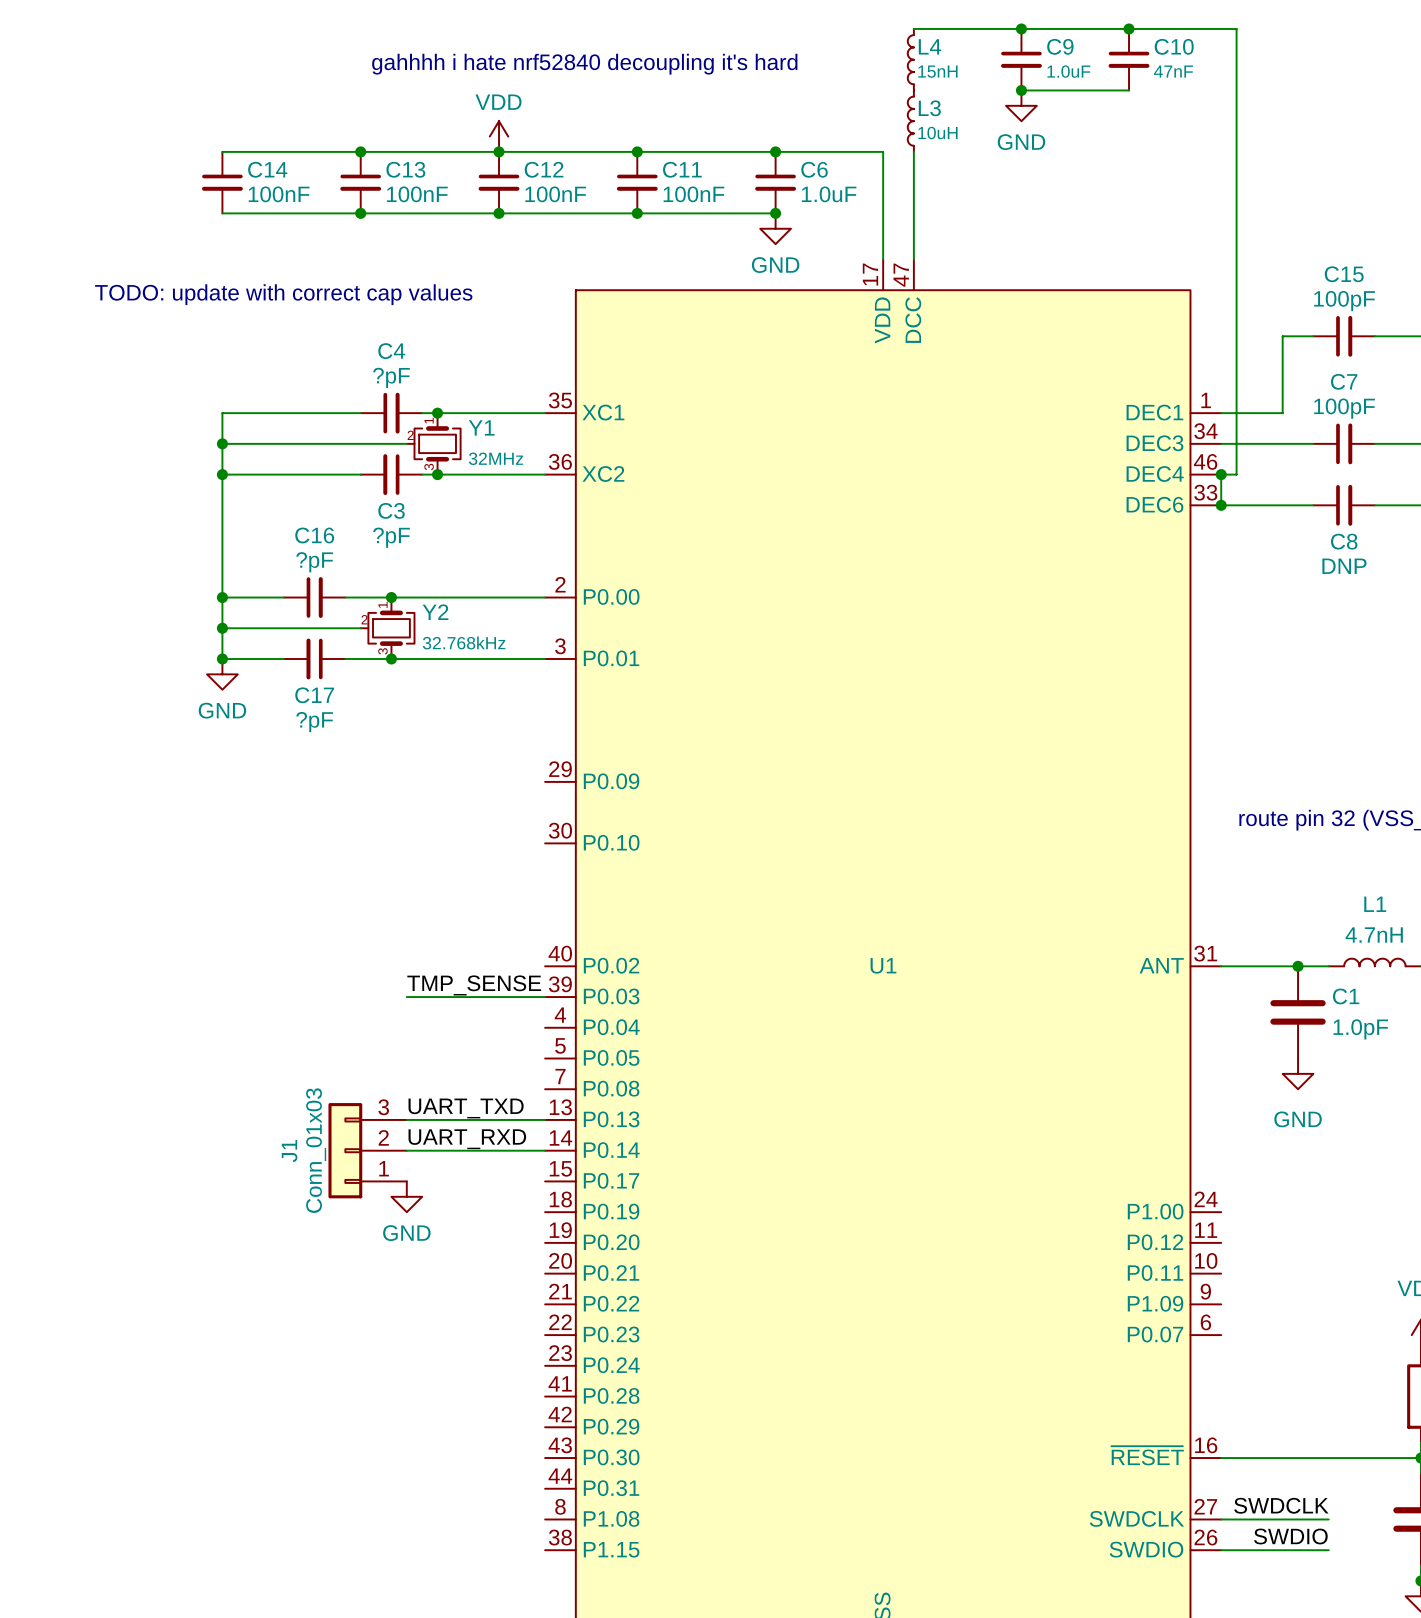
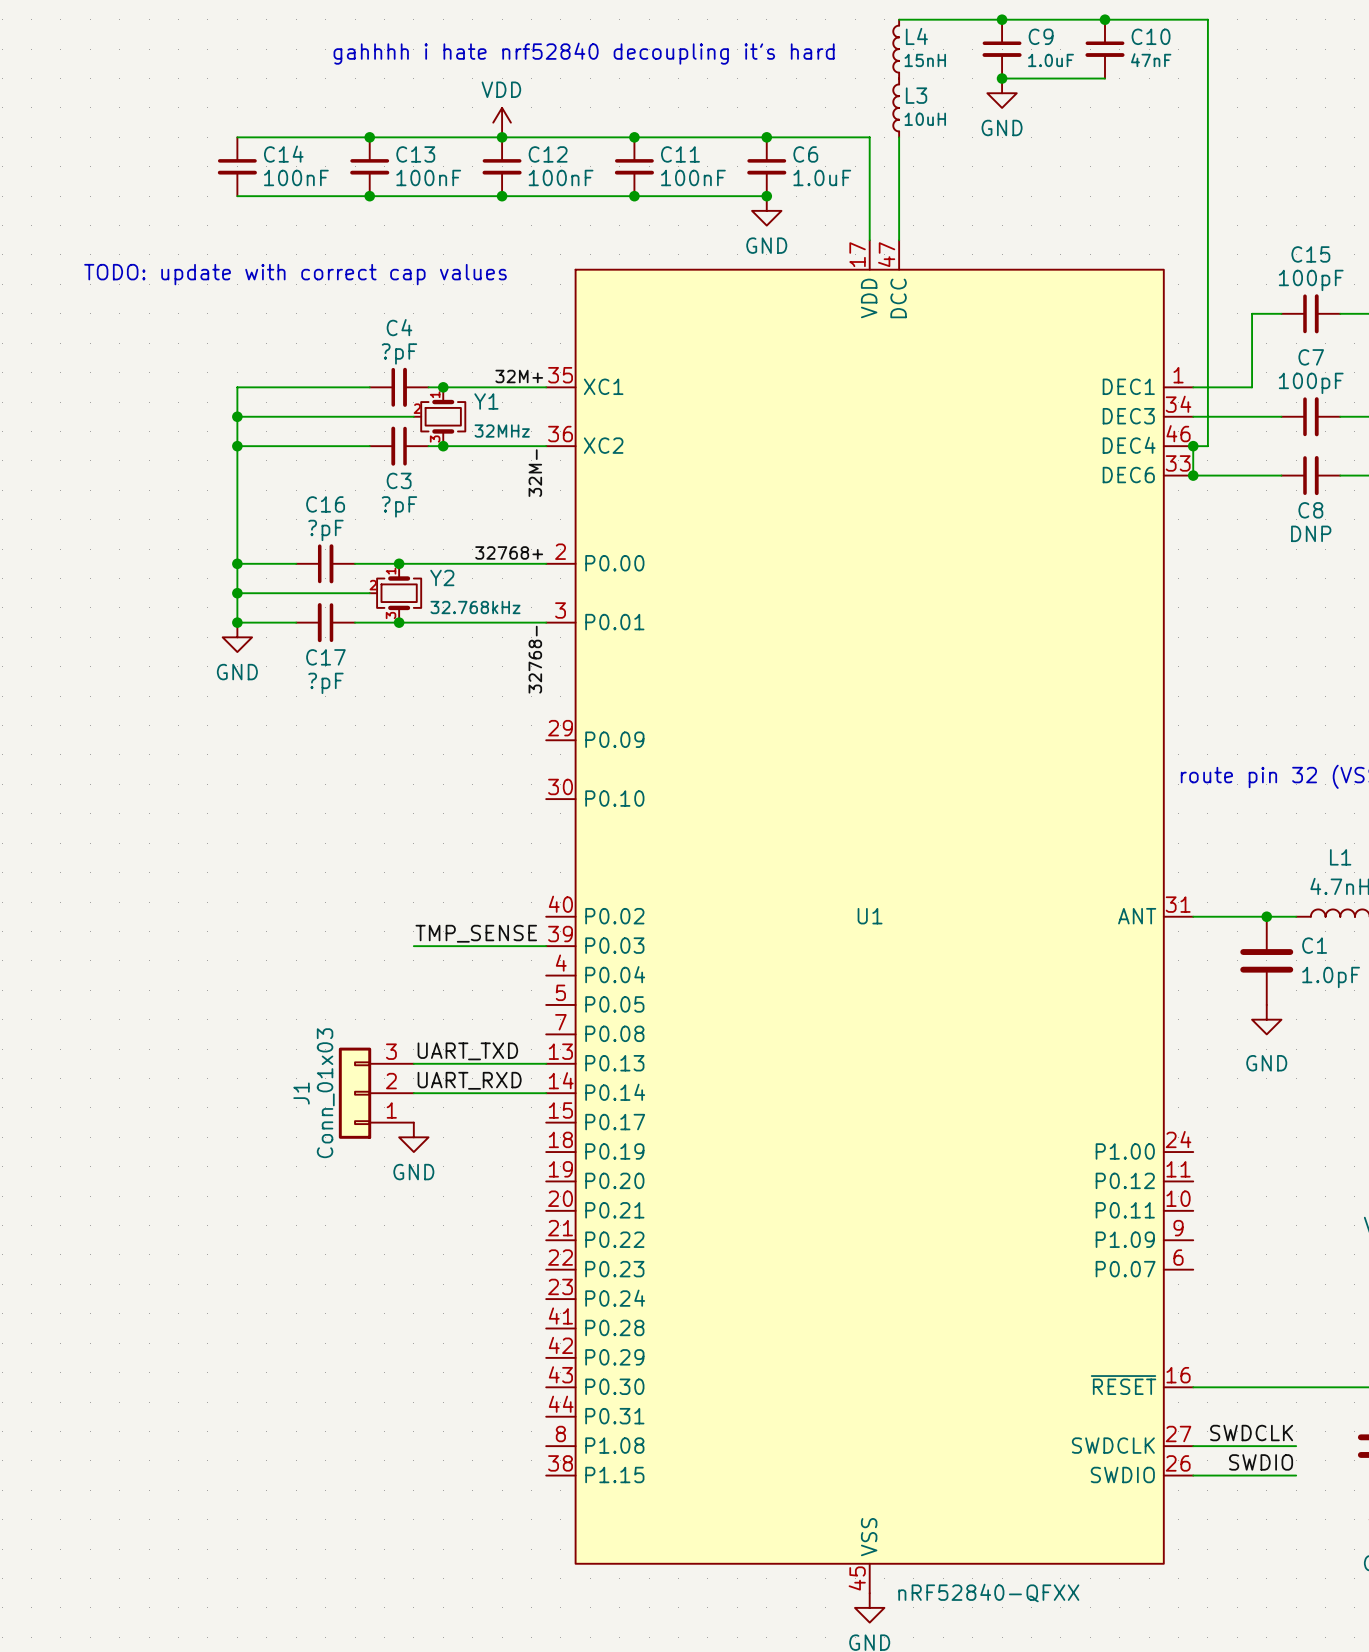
label: none -> 32M+ (519, 376)
label: none -> 32M- (535, 473)
label: none -> 32768+ (509, 552)
label: none -> 32768- (535, 659)

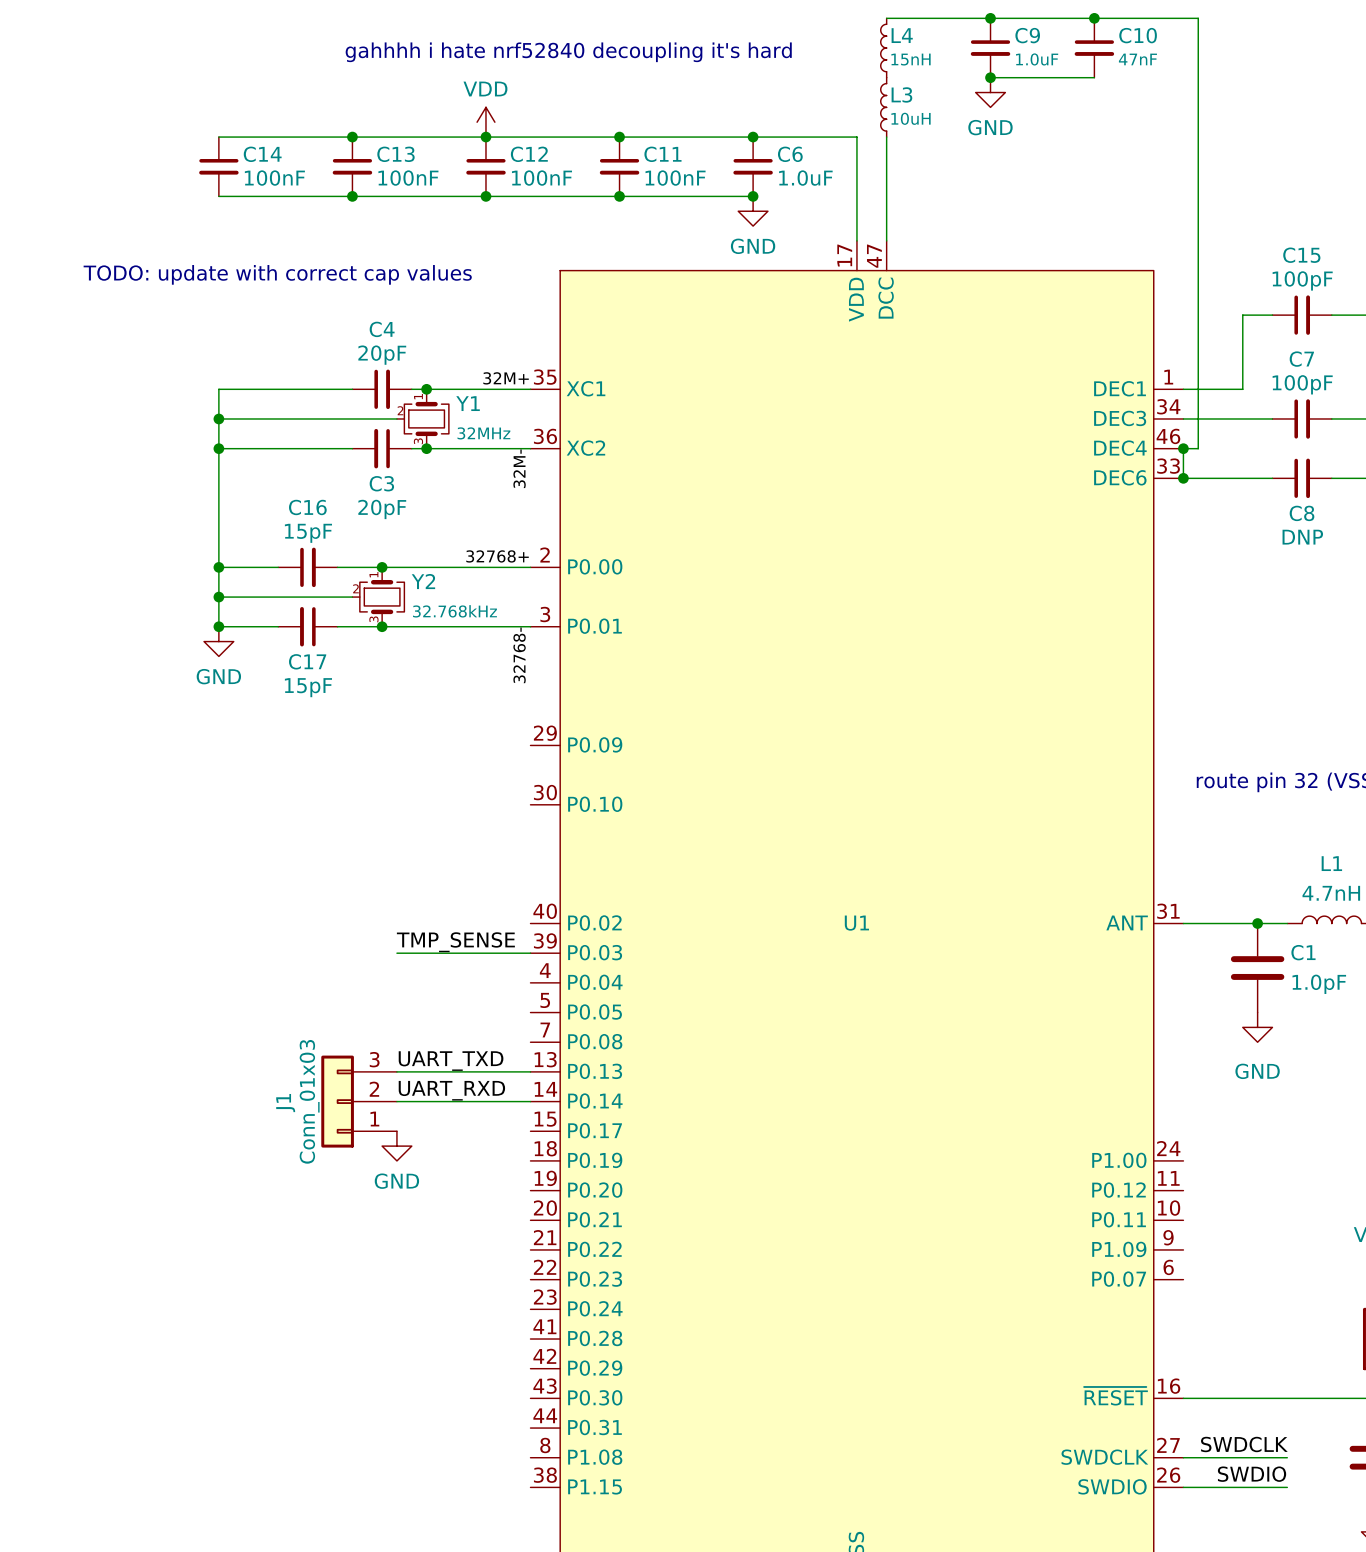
C4 value: ?pF (399, 353) -> 20pF (382, 355)
C3 value: ?pF (399, 506) -> 20pF (382, 509)
C16 value: ?pF (325, 530) -> 15pF (308, 533)
C17 value: ?pF (325, 683) -> 15pF (308, 687)

